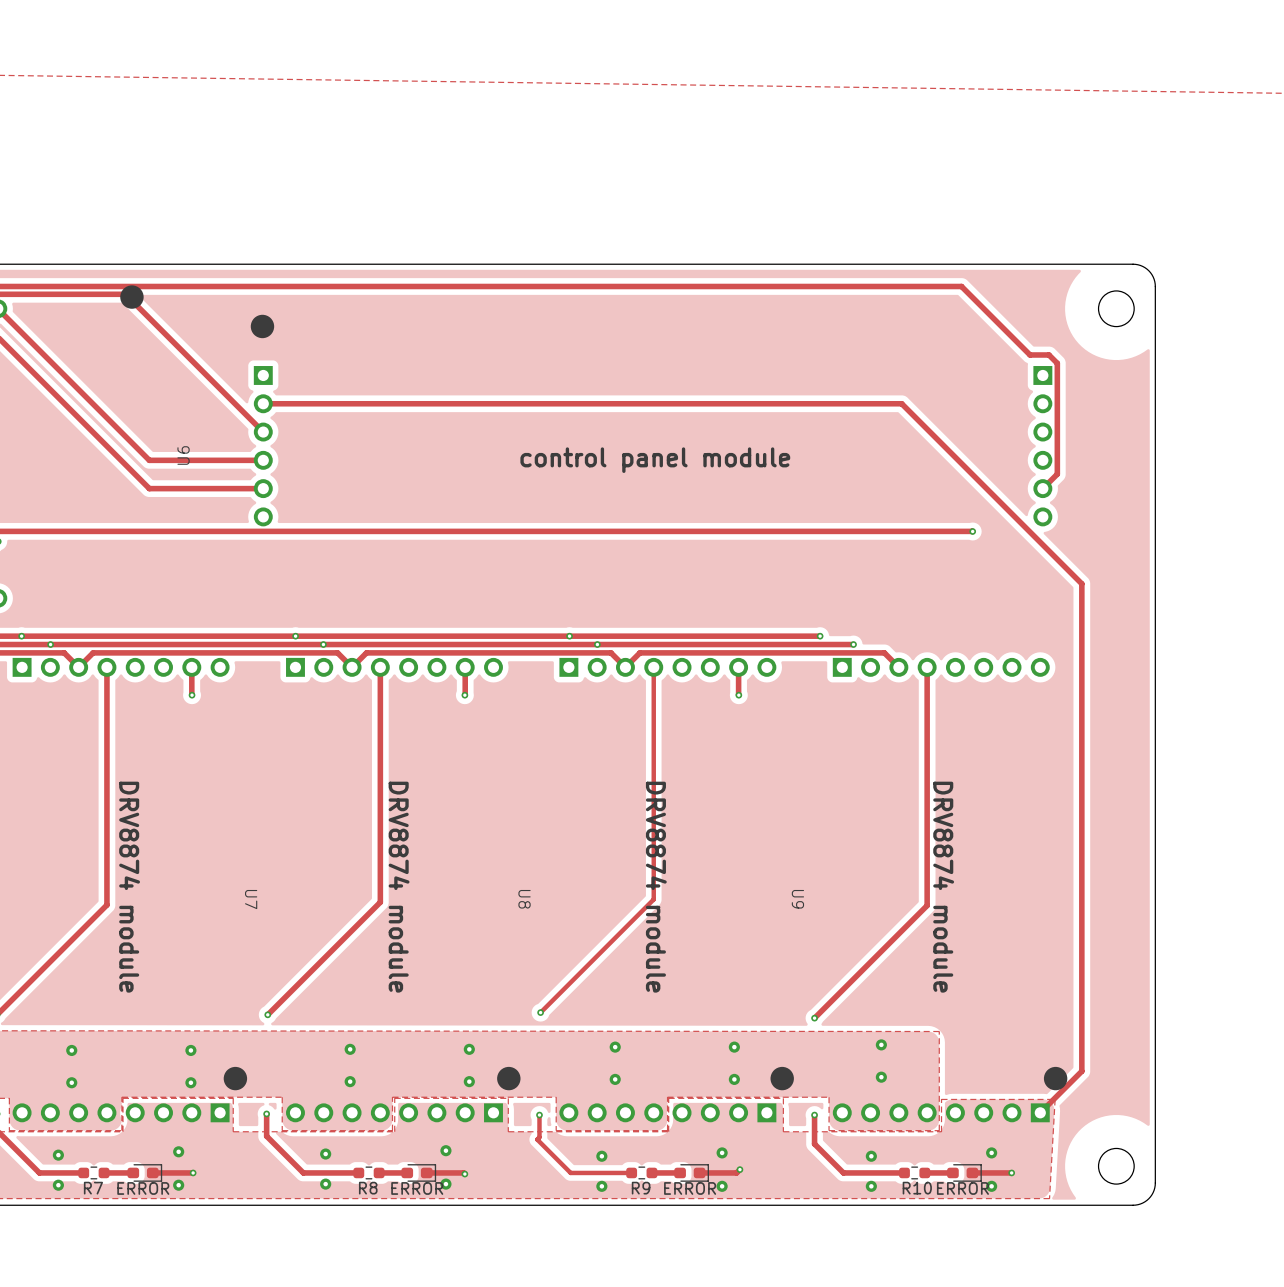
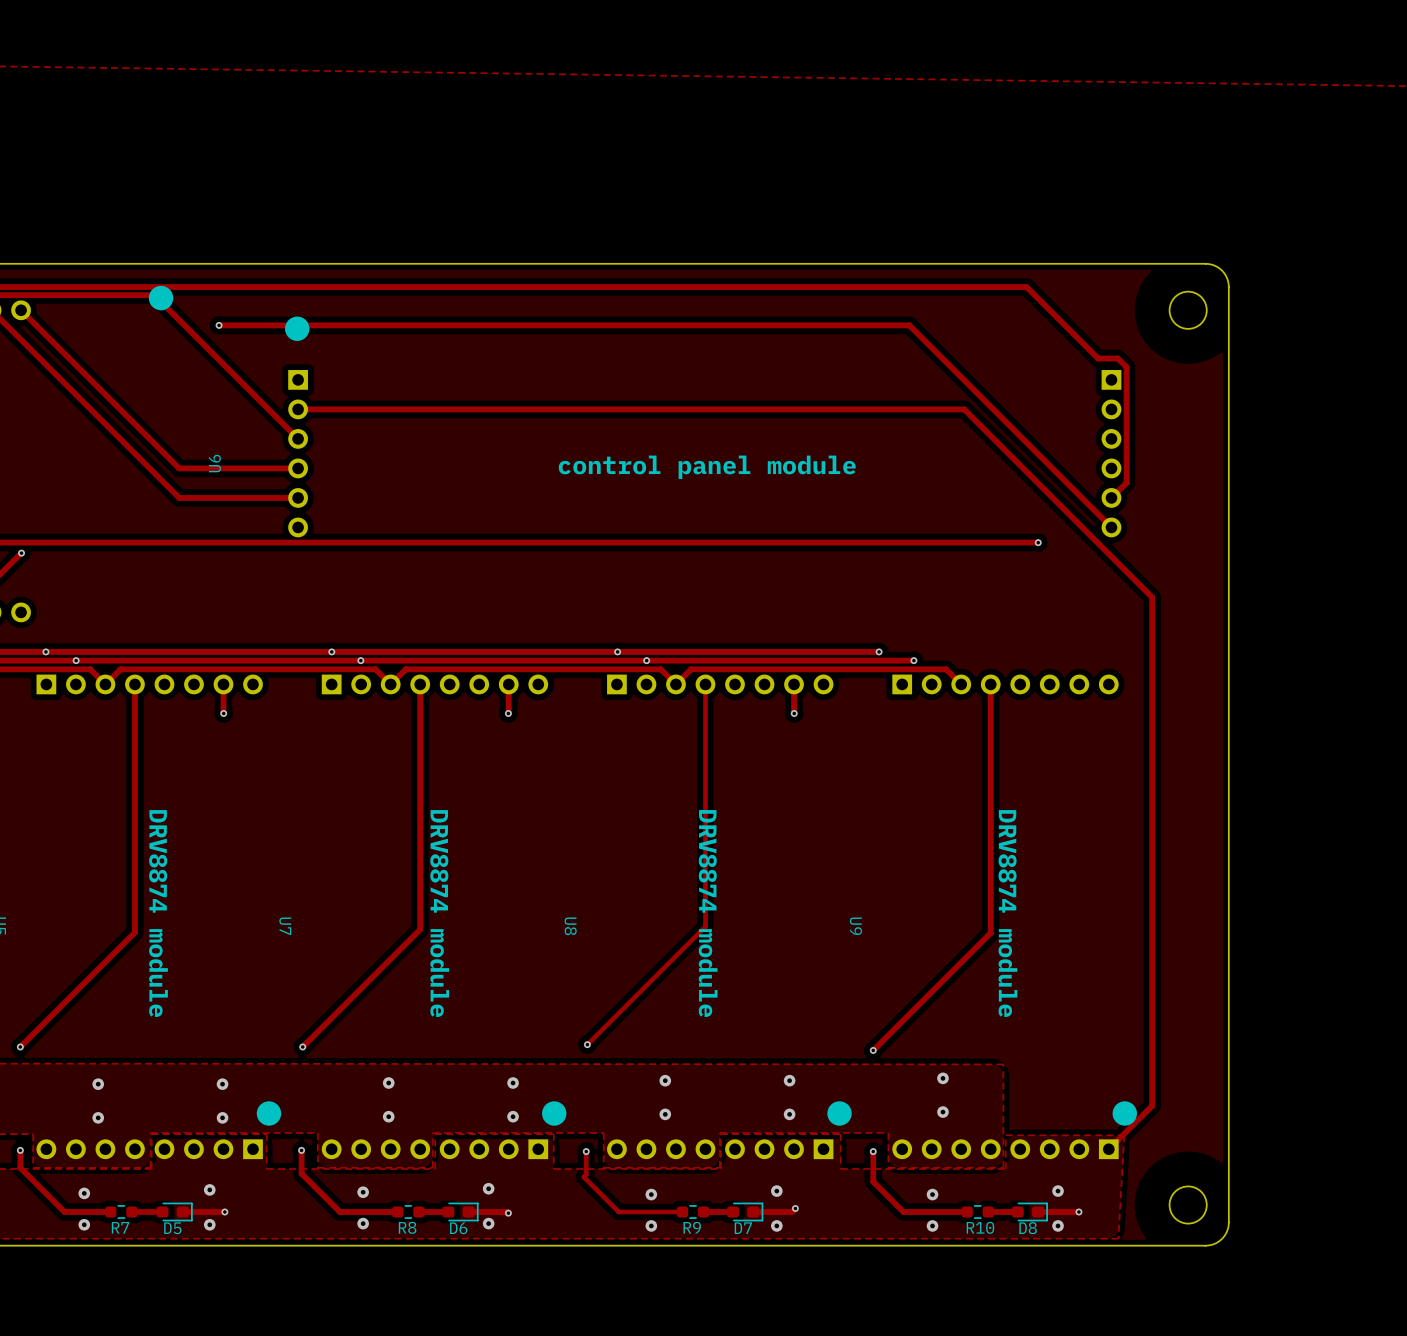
track: none -> (219, 325) (909, 325) (1111, 527)
via: none -> (219, 325)
ERROR name: ERROR (143, 1188) -> D5 (172, 1228)
ERROR name: ERROR (417, 1188) -> D6 (458, 1228)
ERROR name: ERROR (690, 1188) -> D7 (743, 1228)
ERROR name: ERROR (962, 1188) -> D8 (1028, 1228)

